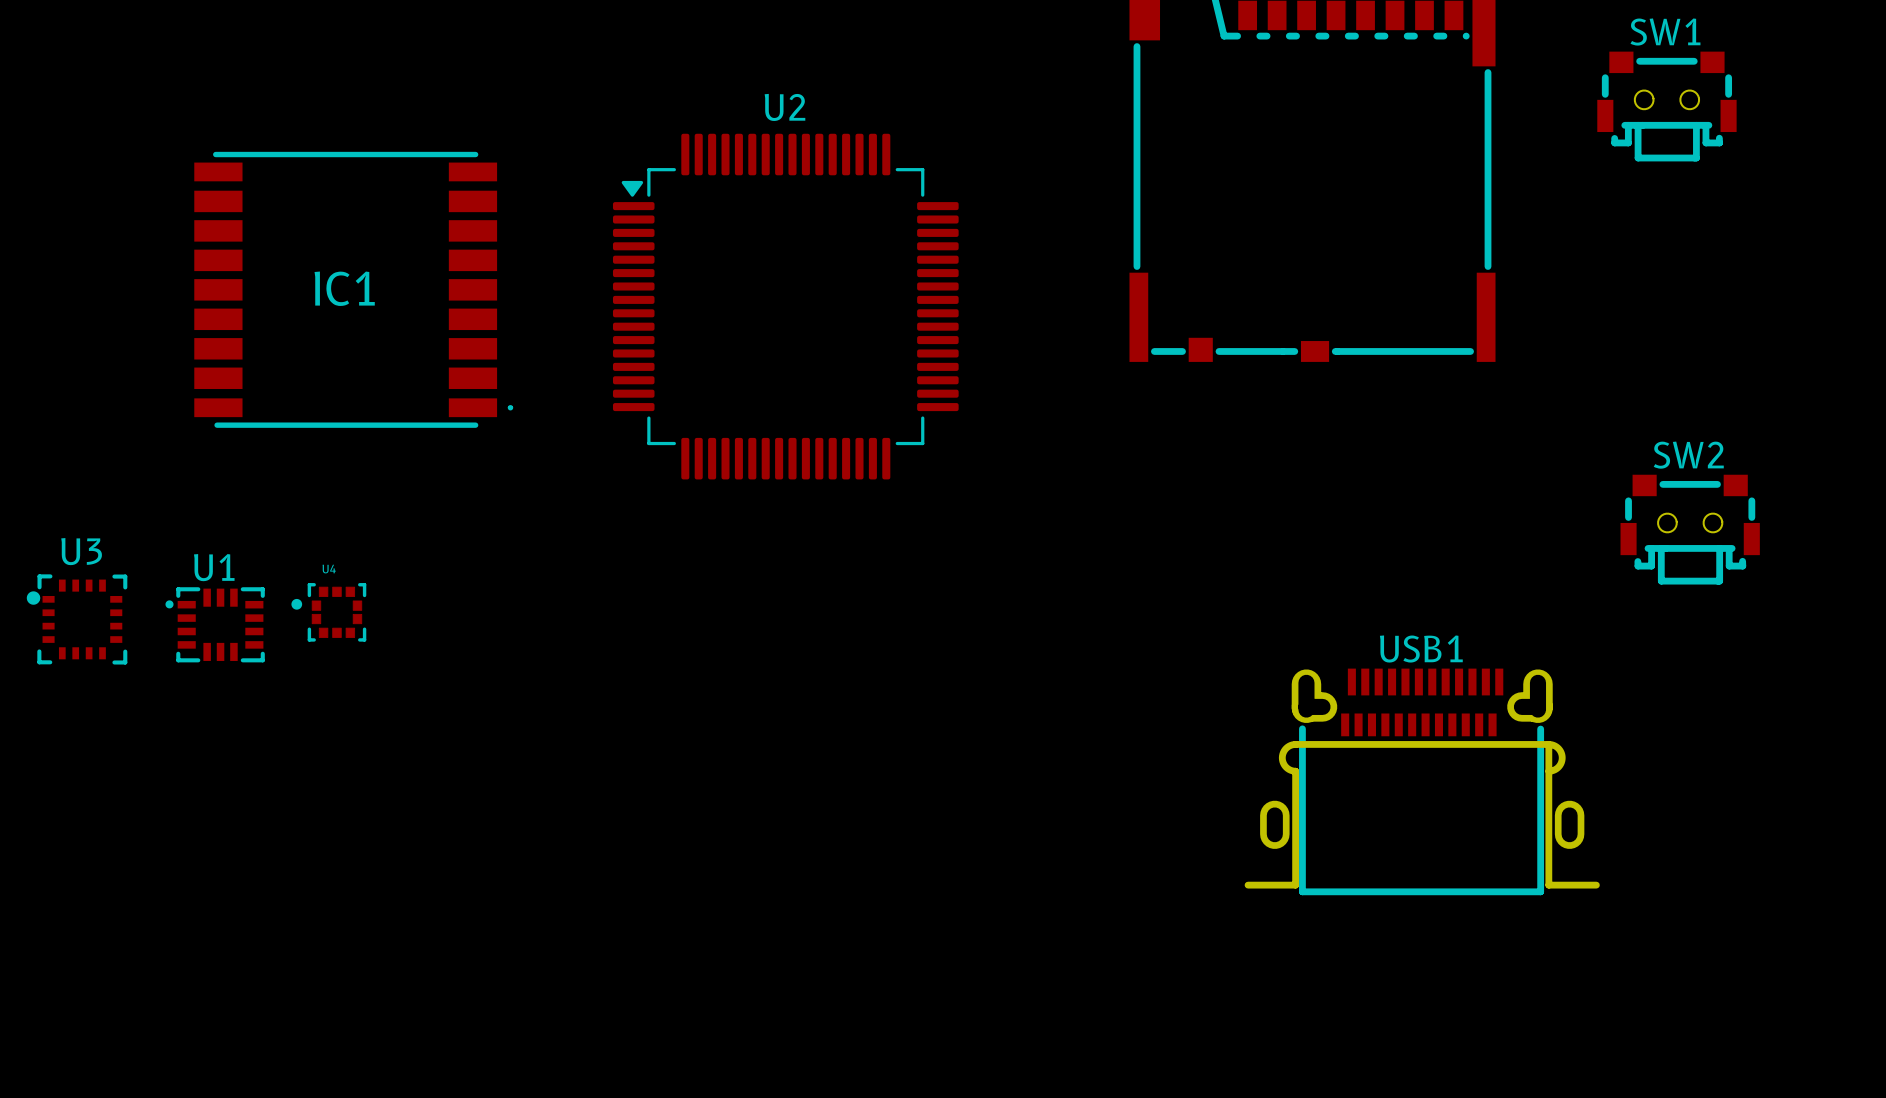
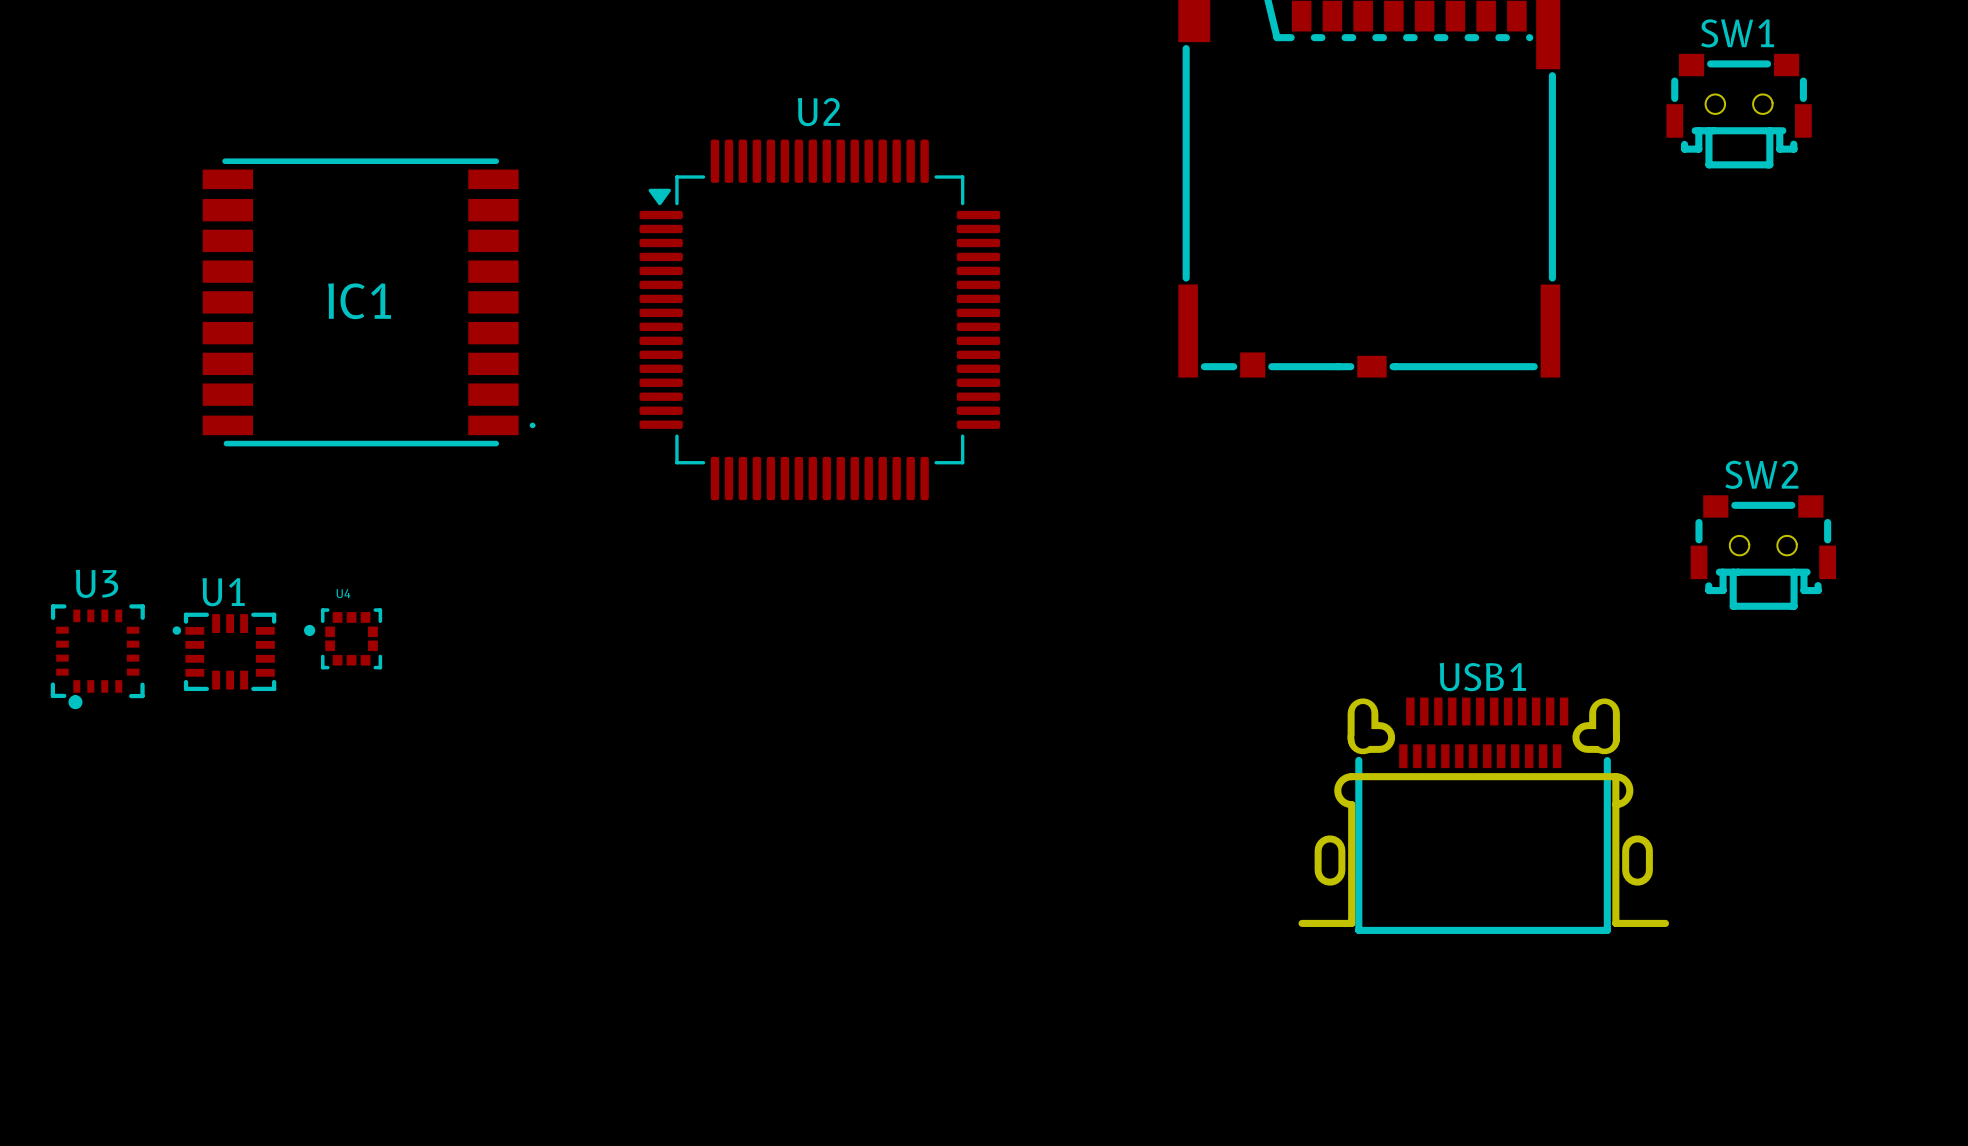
U3 rotation: 0° (77, 619) -> 90° counterclockwise (97, 656)

